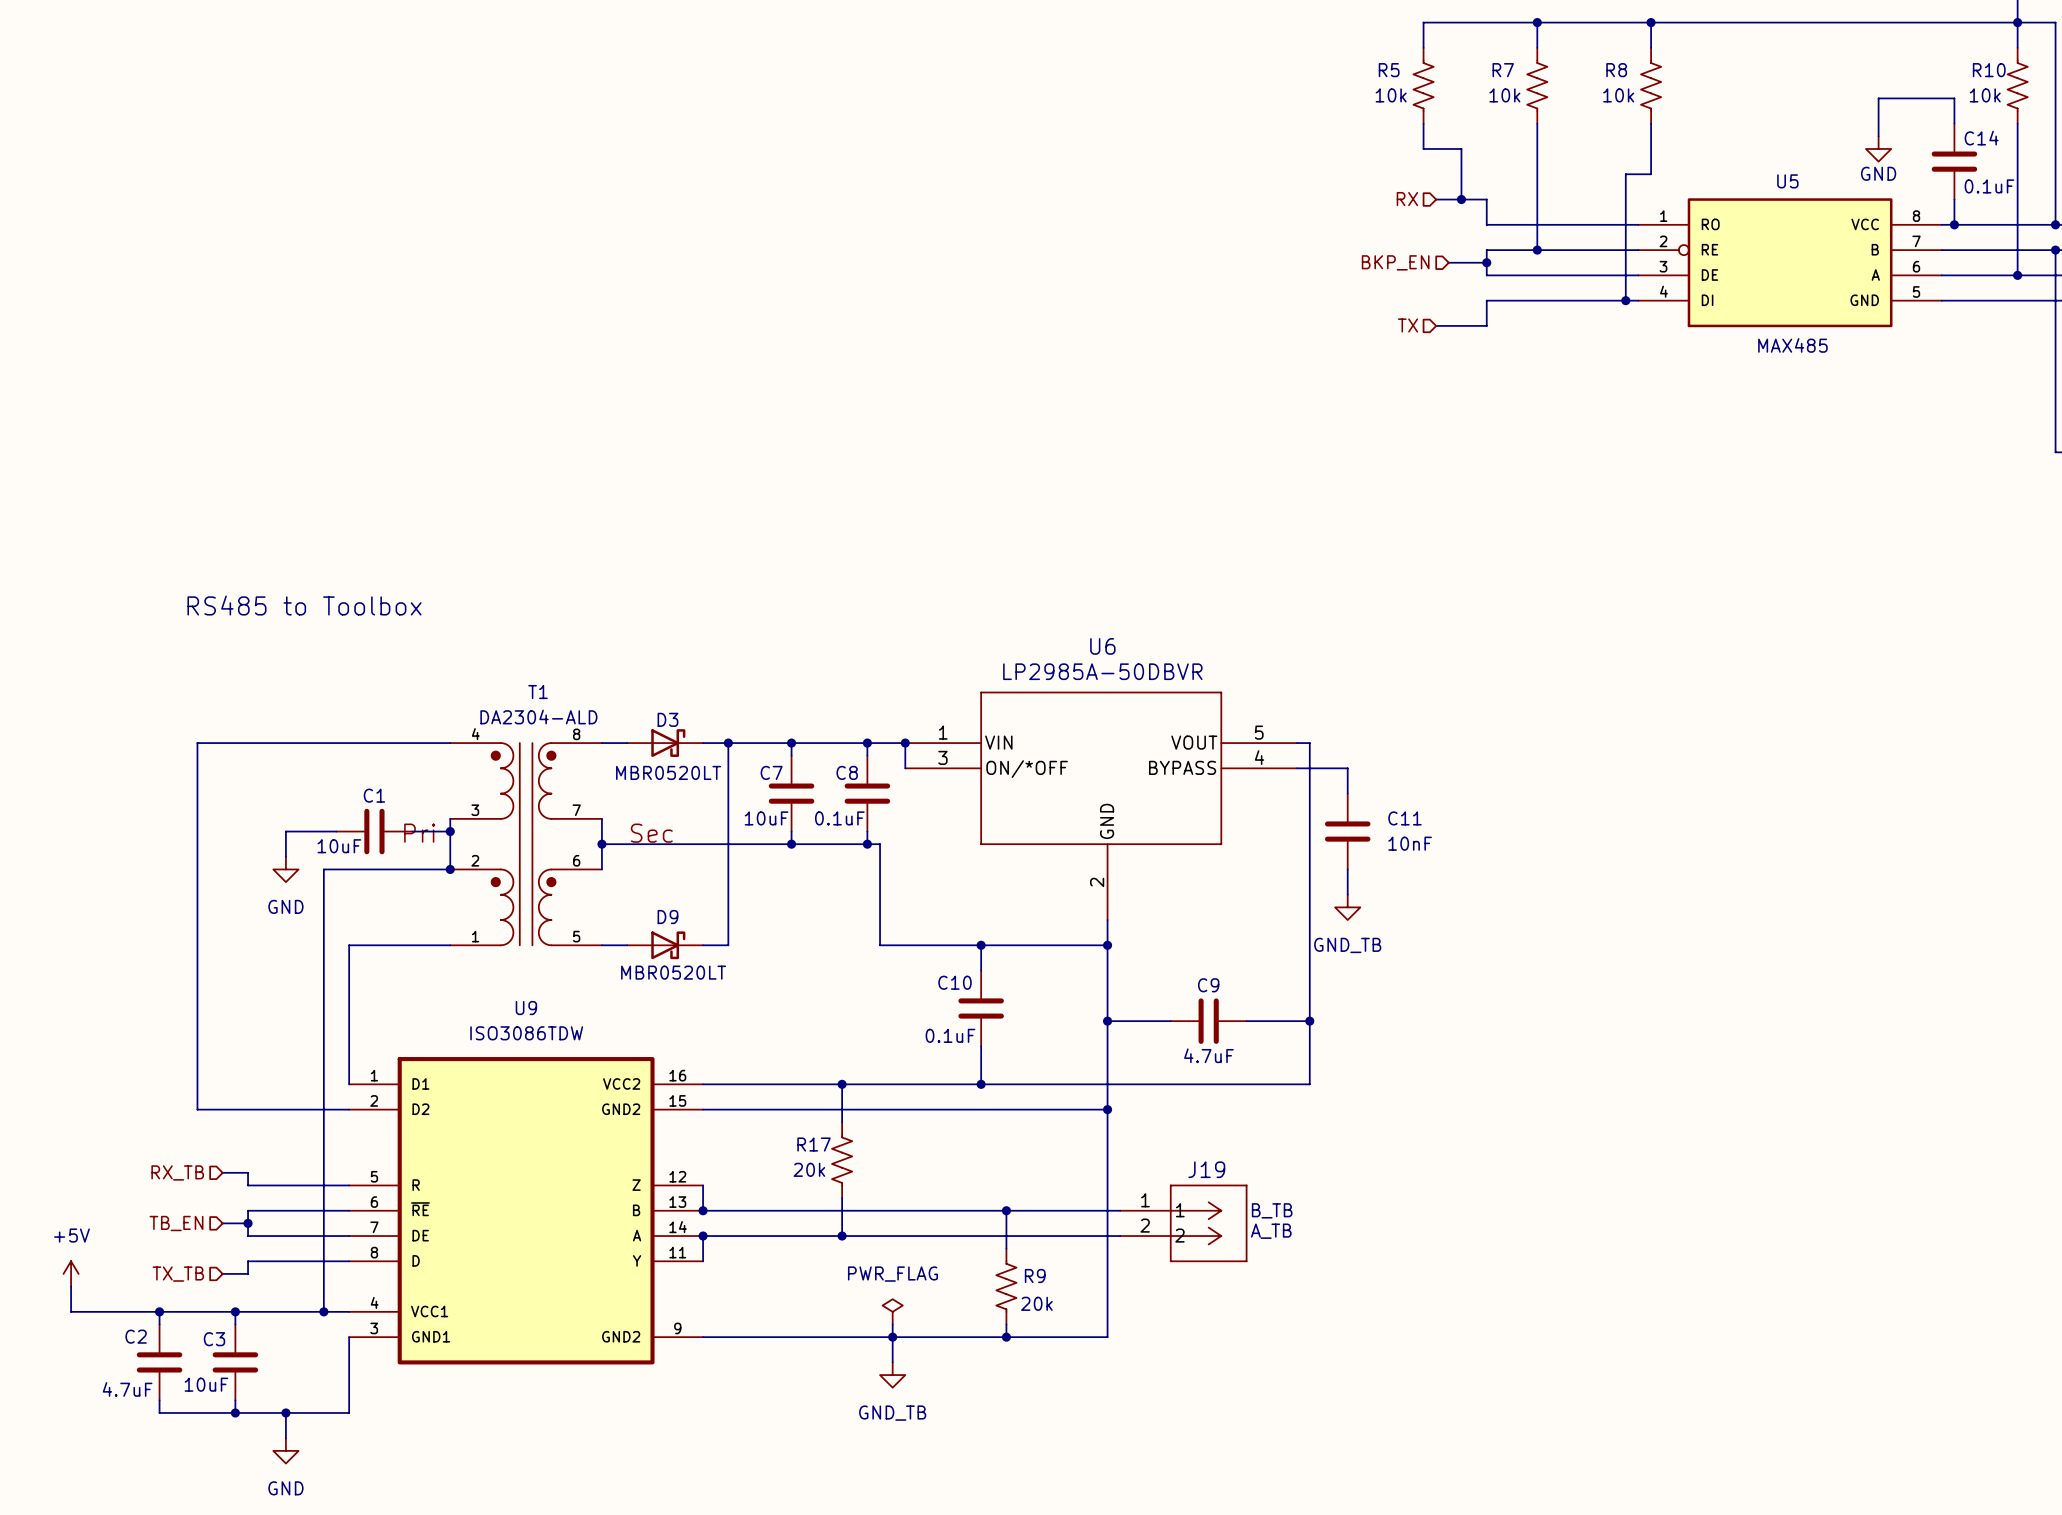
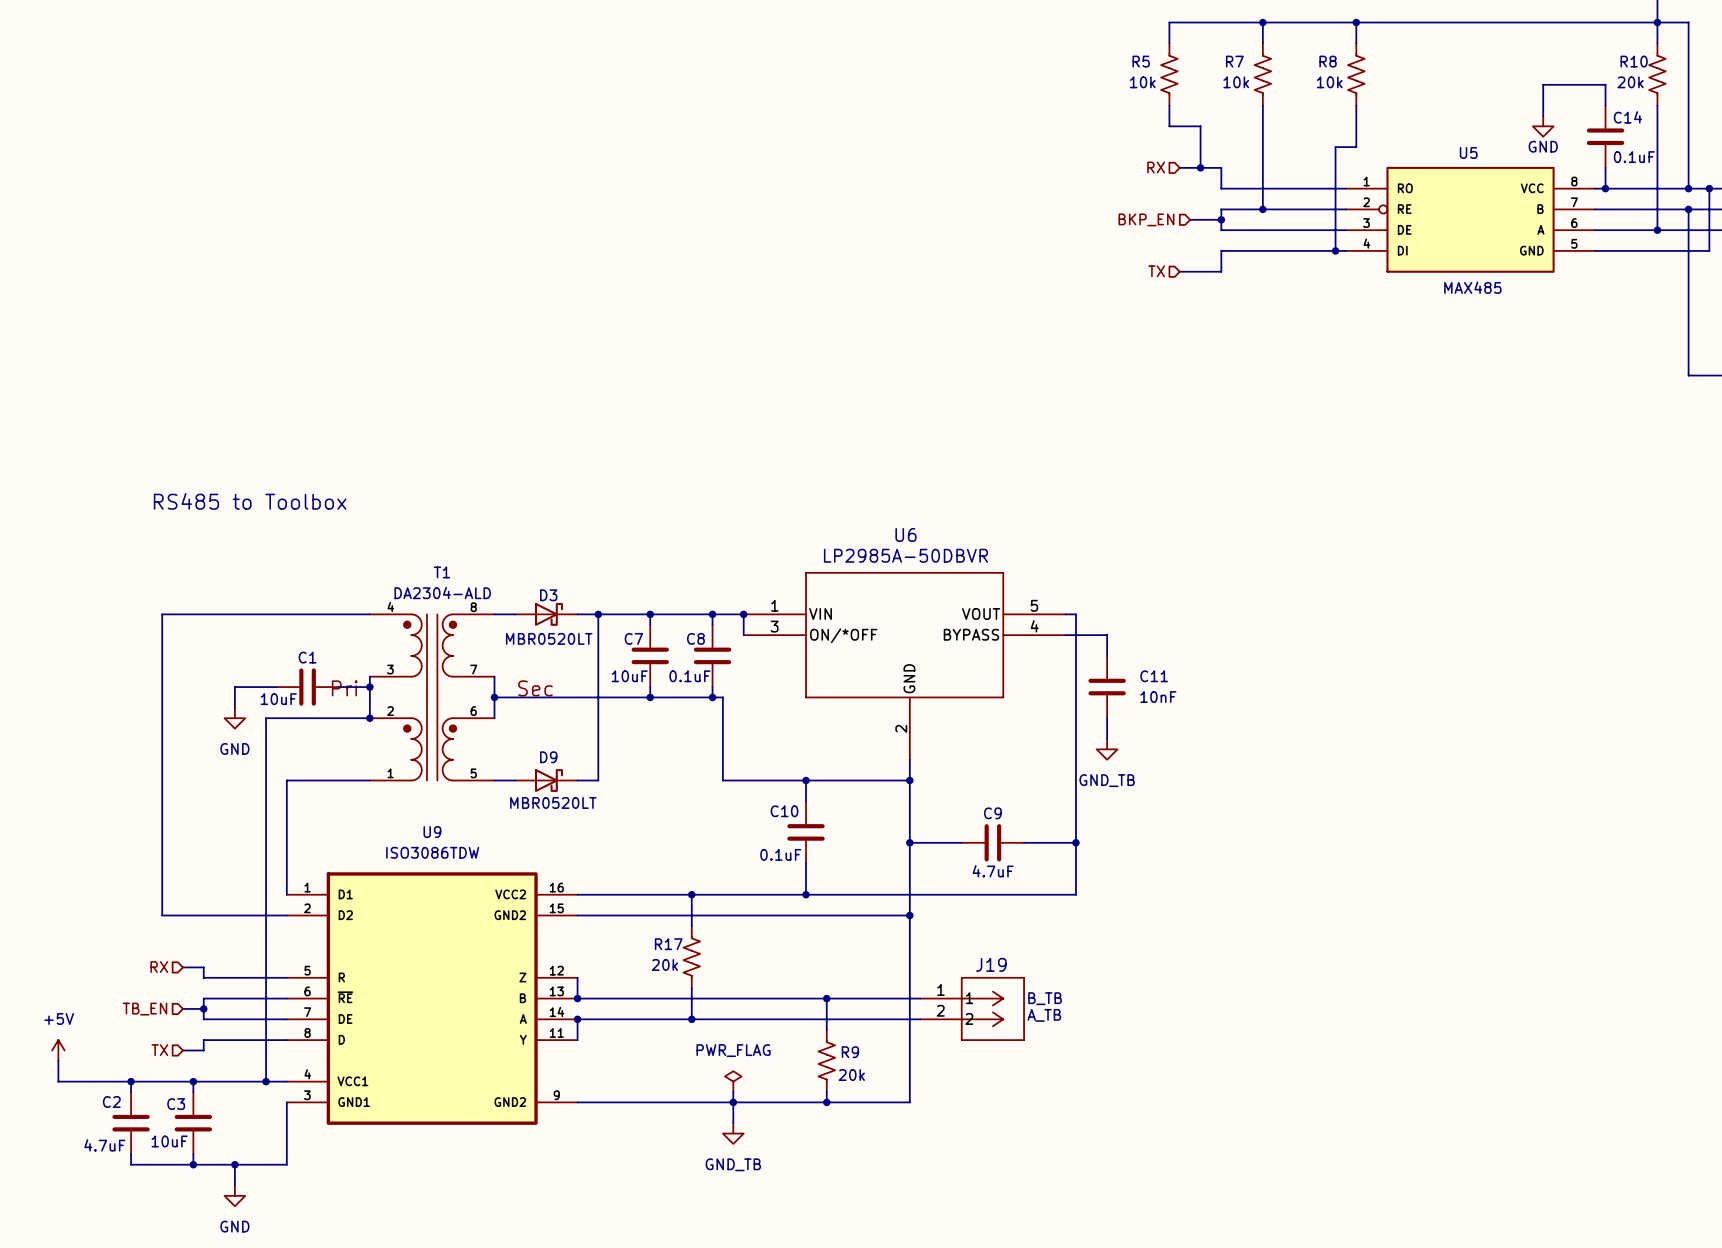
R10 value: 10k (1985, 95) -> 20k (1630, 82)
hierarchical label: RX_TB (177, 1172) -> RX (159, 967)
hierarchical label: TX_TB (178, 1274) -> TX (159, 1050)

